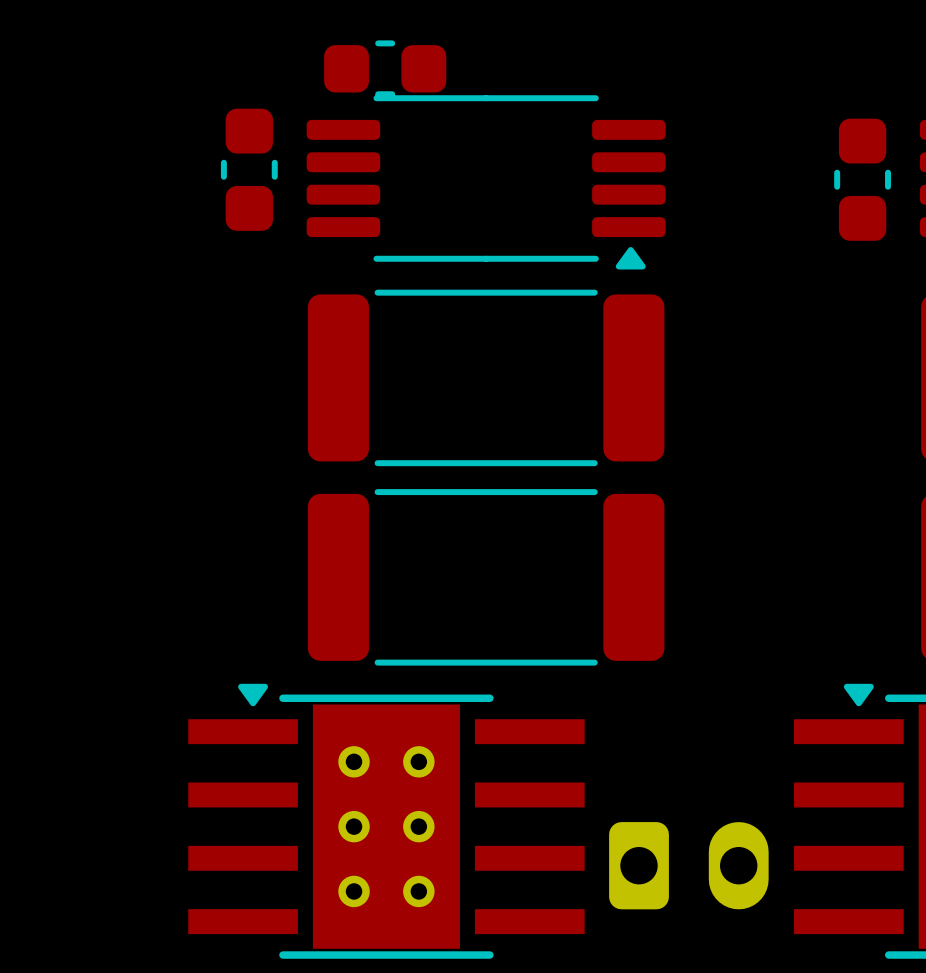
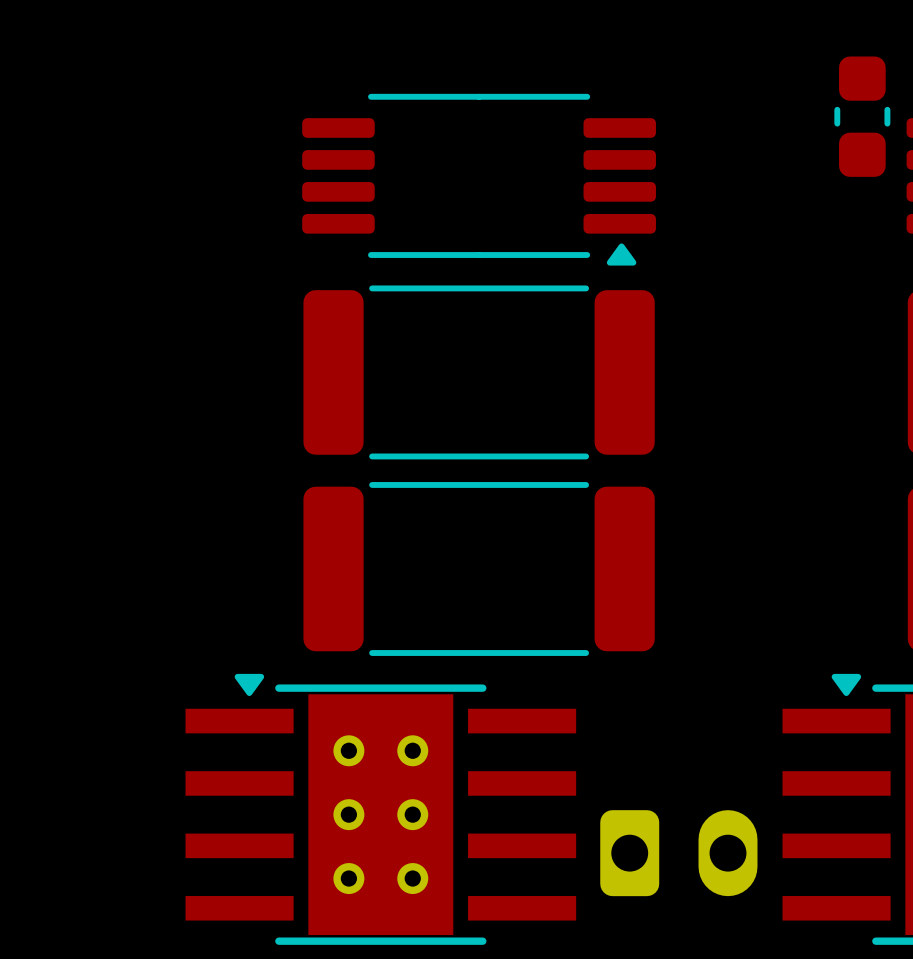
part: (385, 68) -> none
part: (249, 169) -> none
part position: (862, 179) -> (862, 116)

